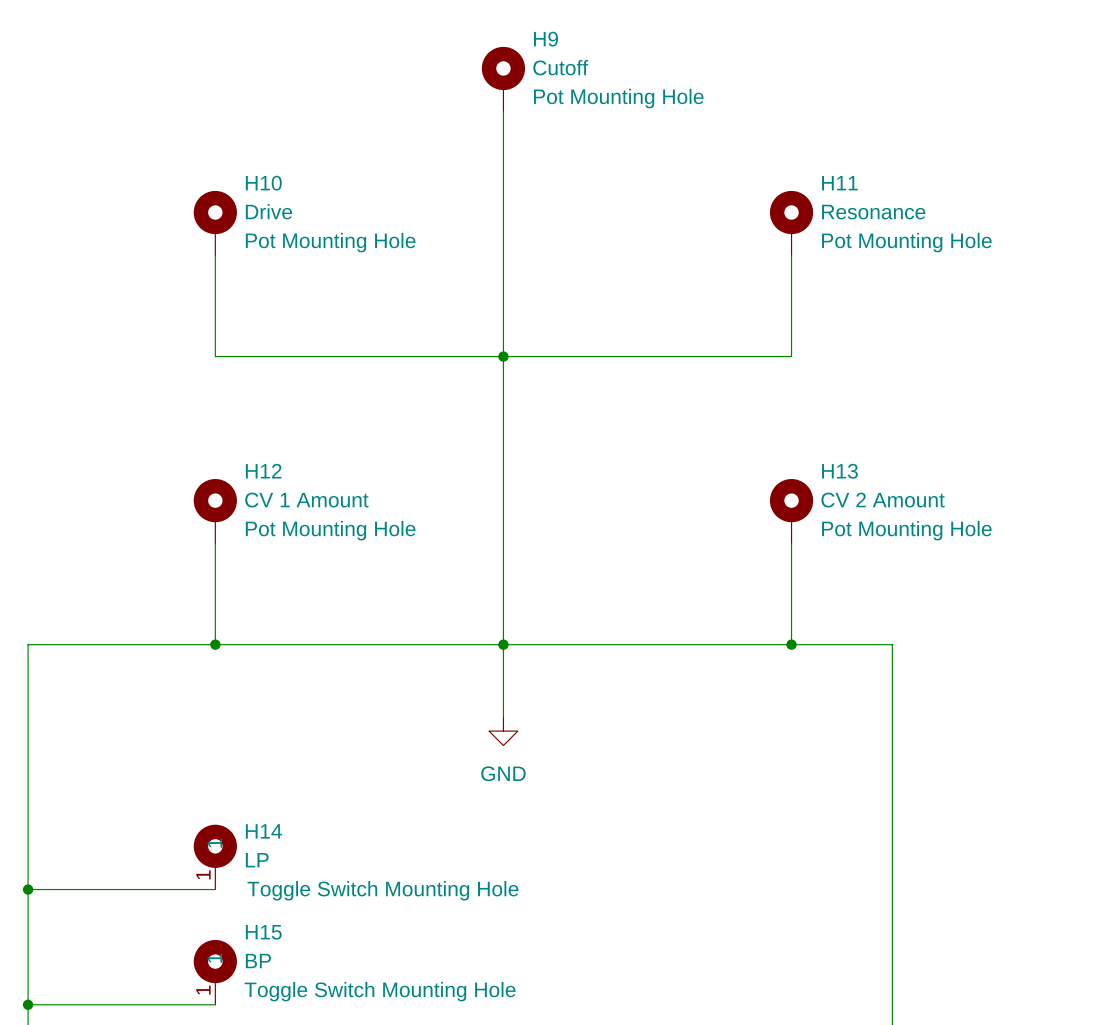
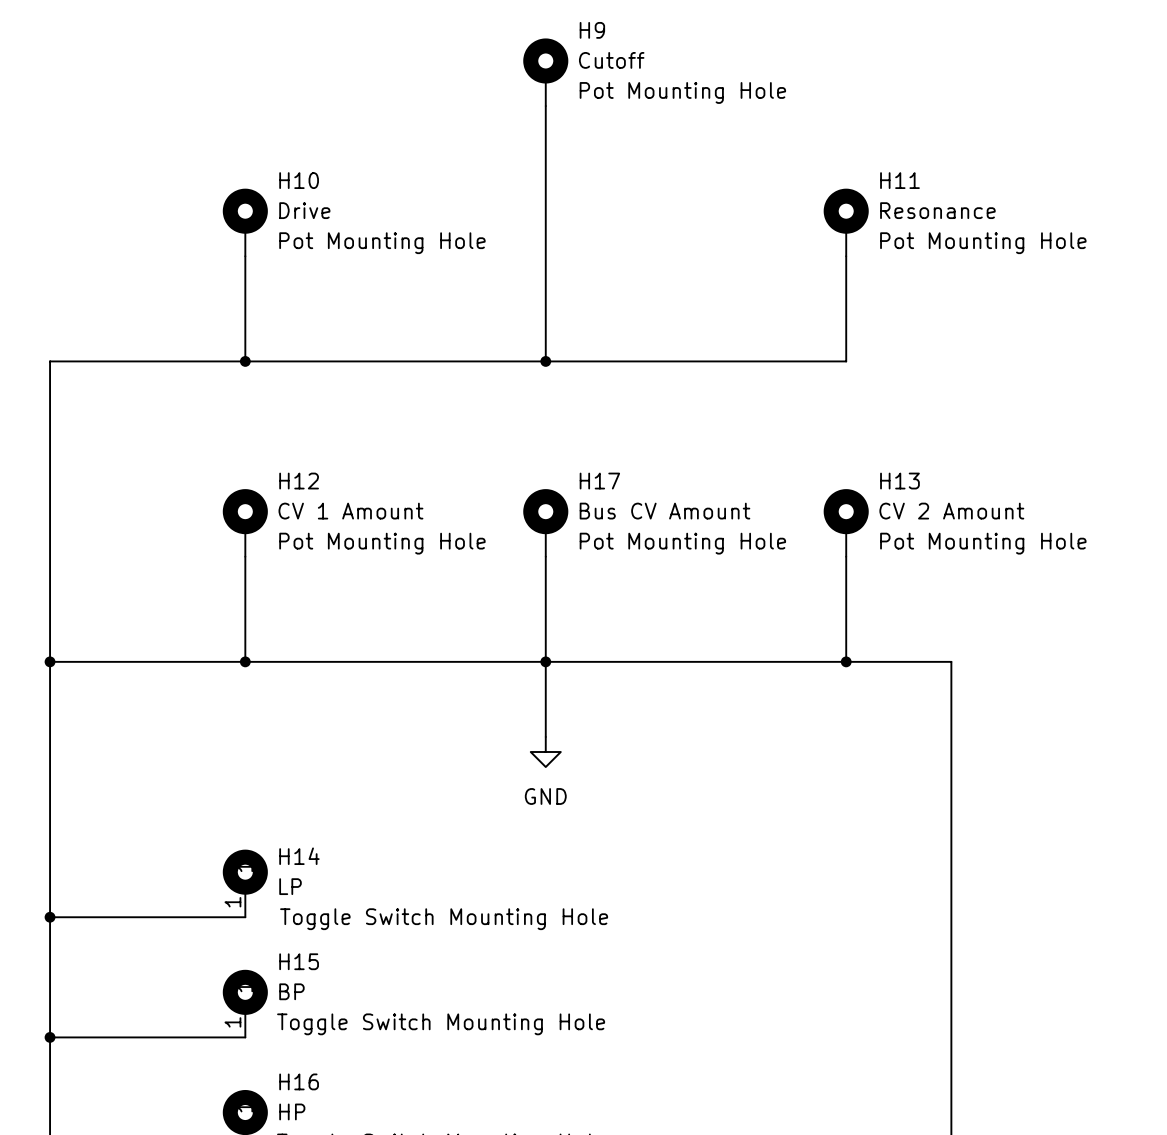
wire: none -> (245, 361) (50, 361) (50, 661)
junction: none -> (245, 361)
wire: (503, 356) (503, 543) -> none
H17: none -> Bus CV Amount (545, 522)
junction: none -> (50, 661)

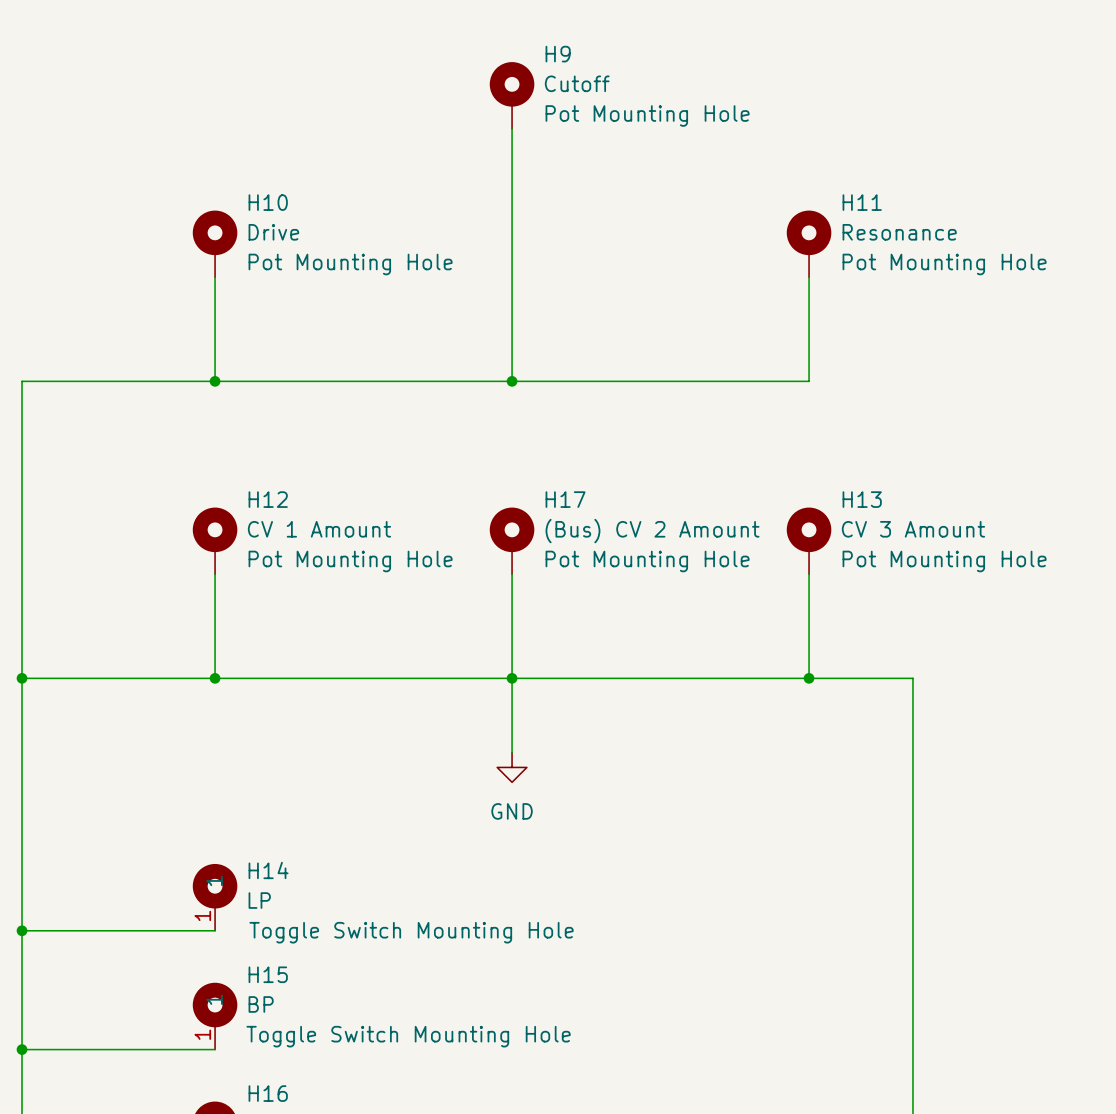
H17 value: Bus CV Amount (664, 511) -> (Bus) CV 2 Amount (652, 531)
H13 value: CV 2 Amount (951, 511) -> CV 3 Amount (913, 529)

